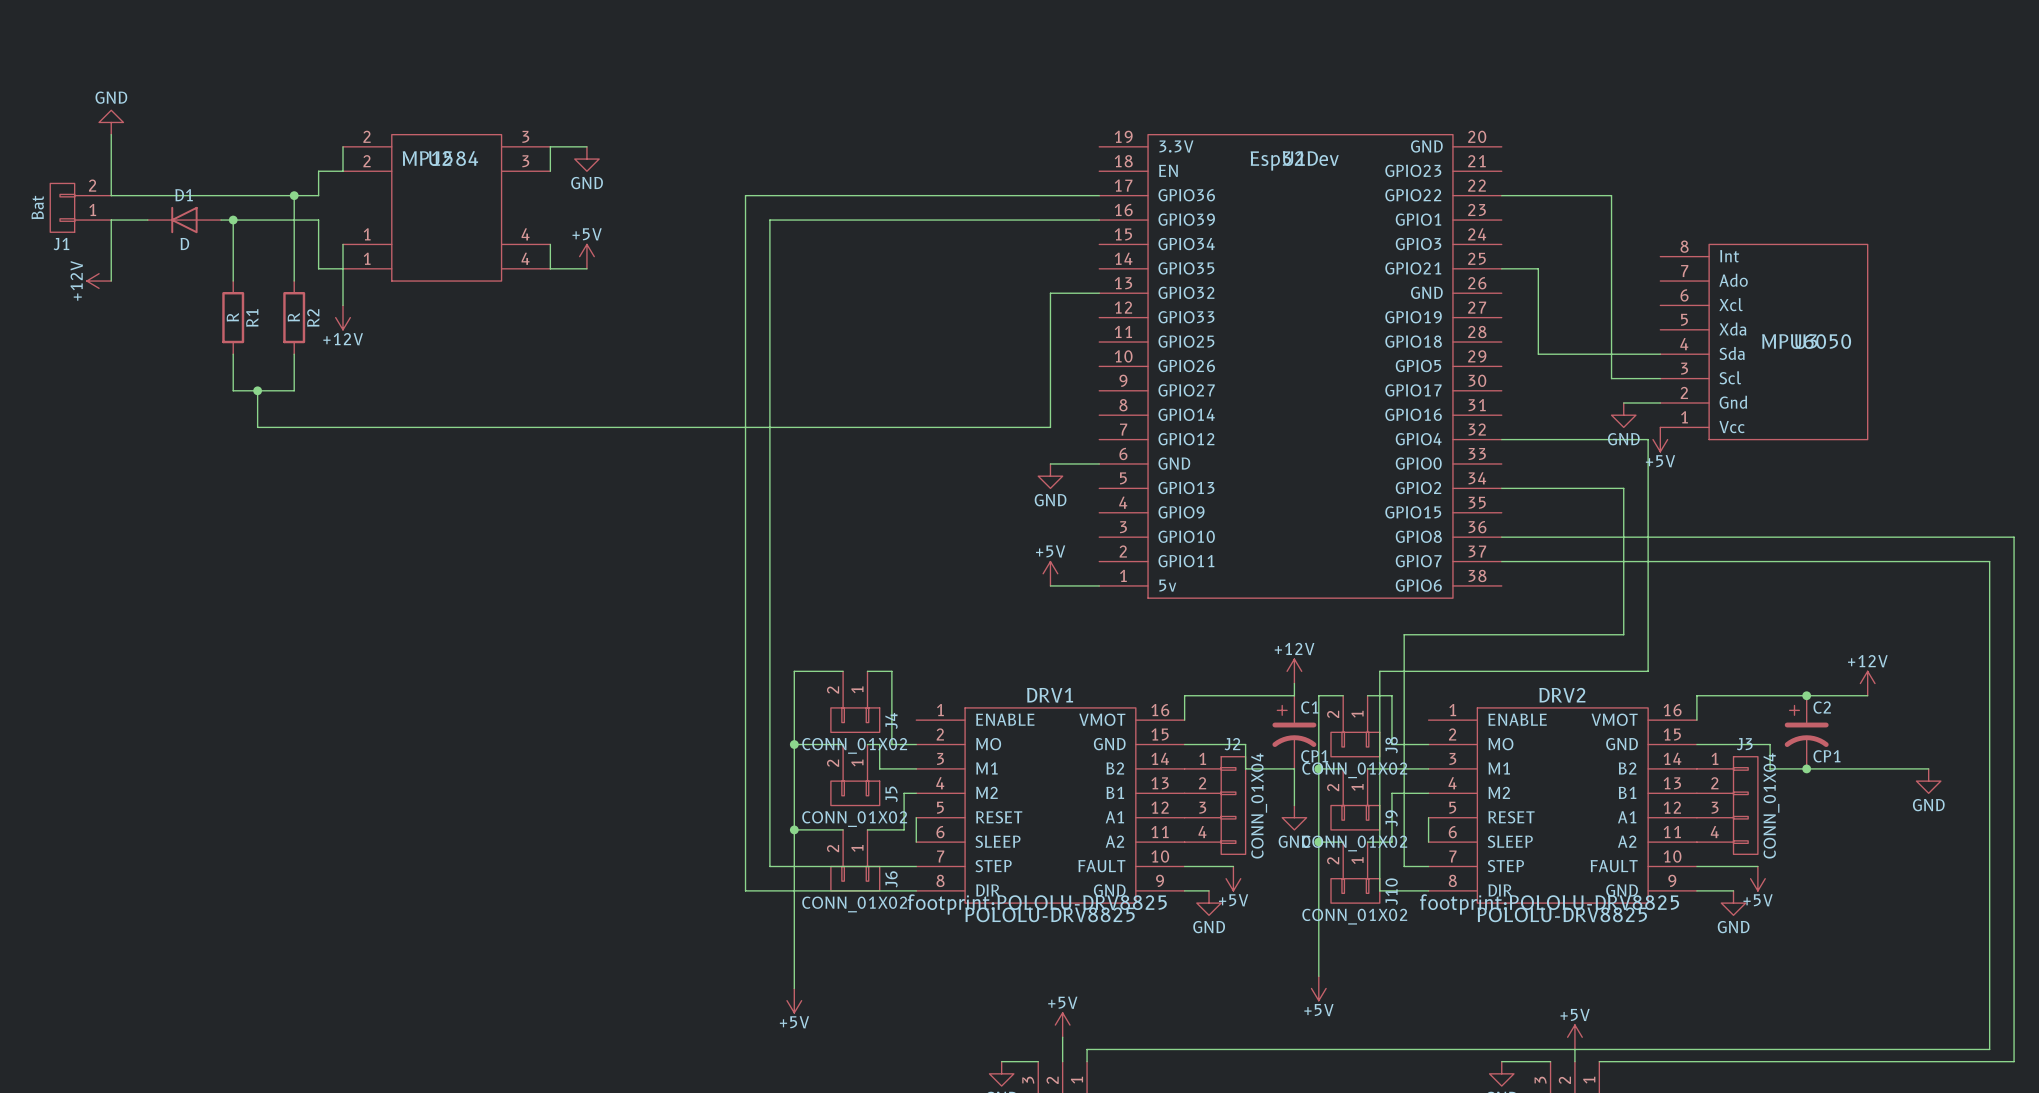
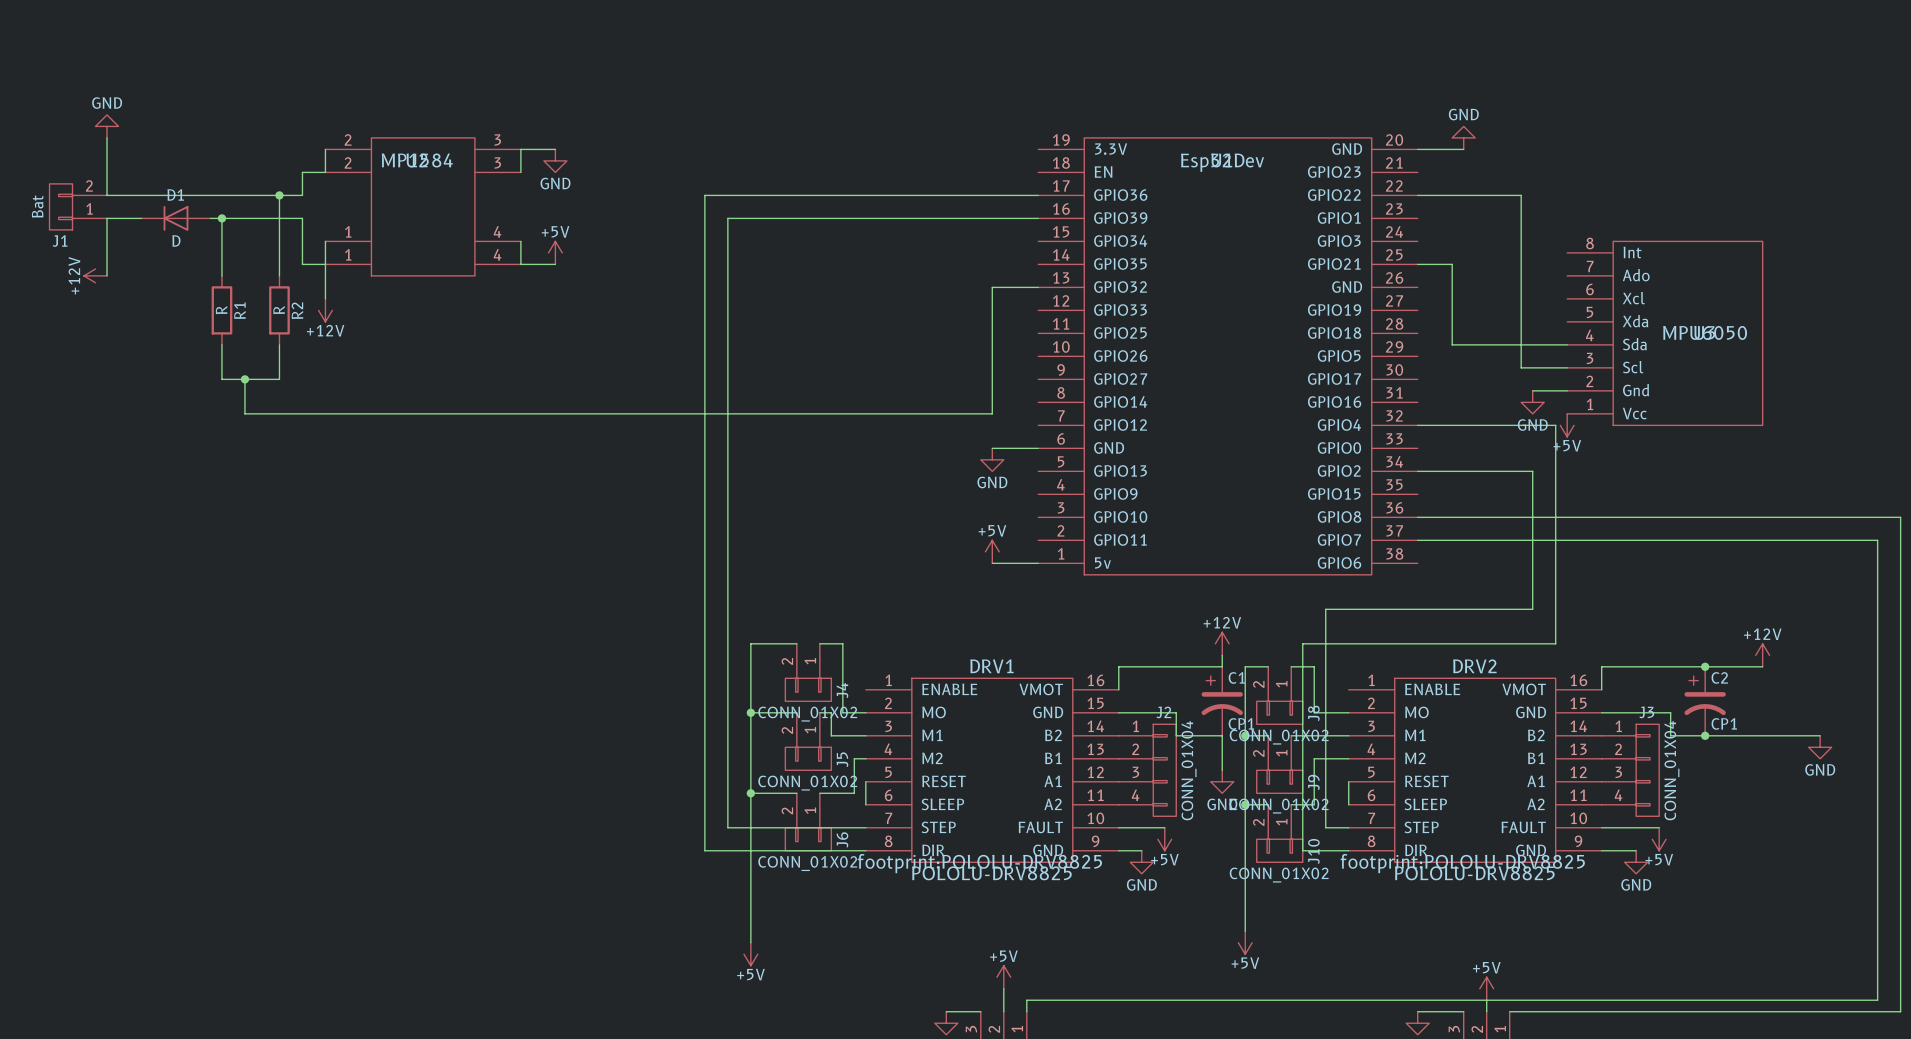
power symbol: none -> GND (1463, 137)
wire: none -> (1417, 149) (1463, 149)

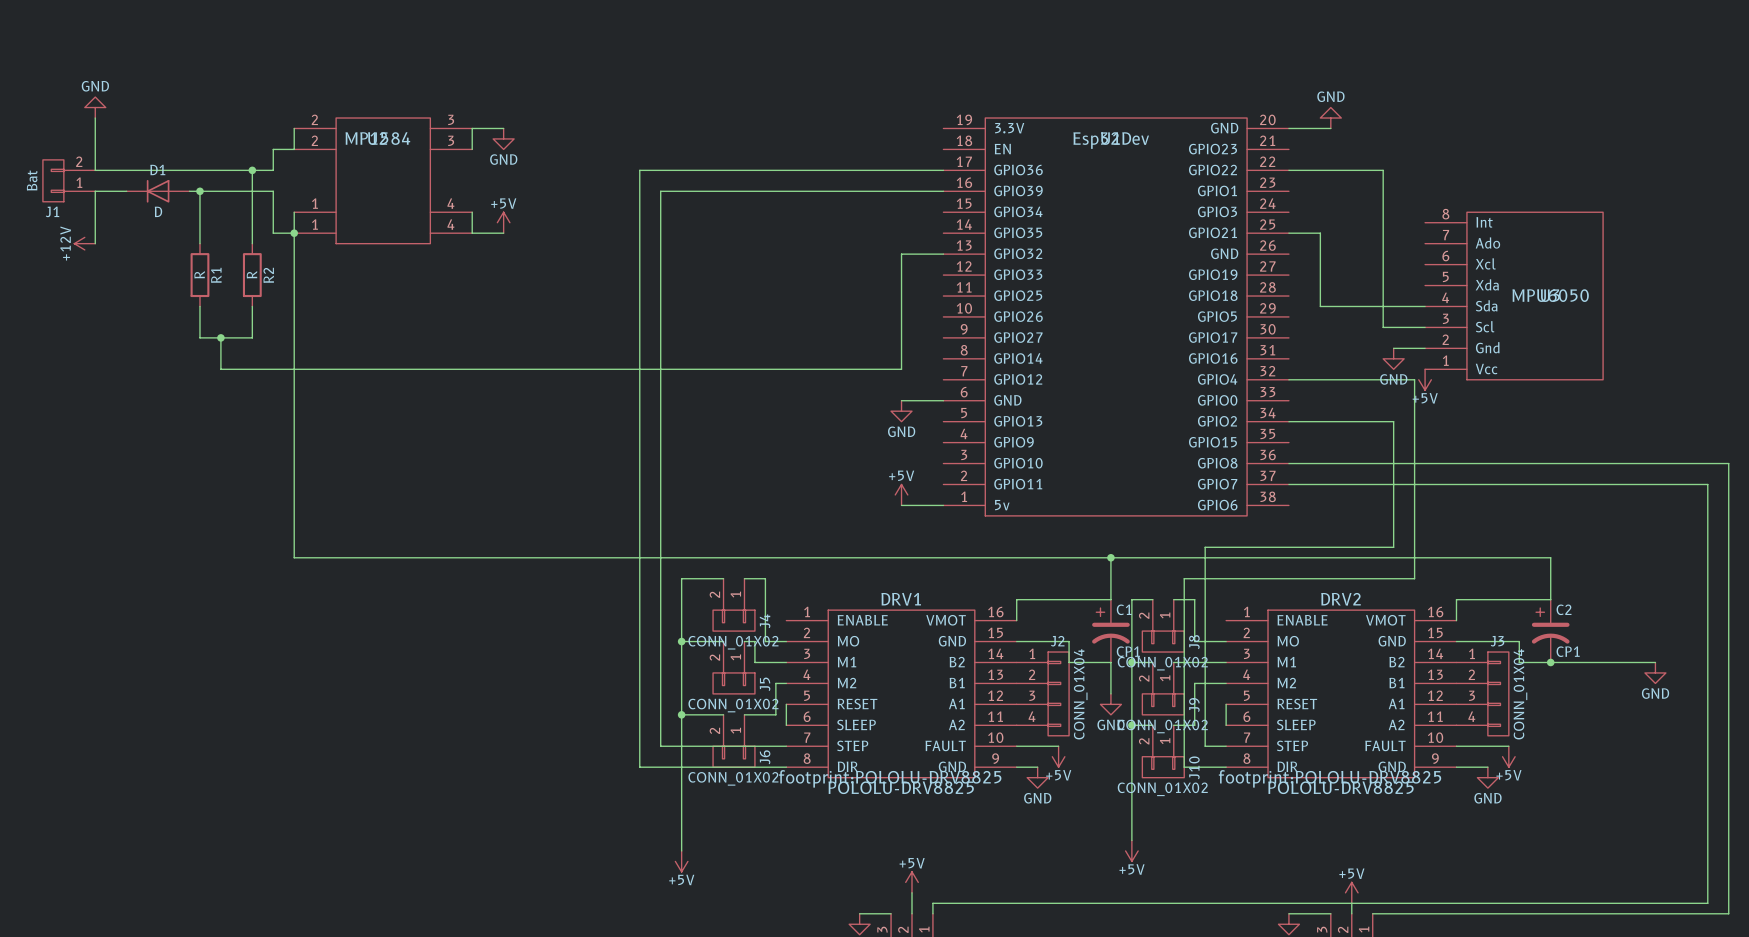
junction: none -> (294, 233)
power symbol: +12V (325, 310) -> none
junction: none -> (1110, 557)
power symbol: +12V (1222, 643) -> none
power symbol: +12V (1762, 655) -> none
wire: (1705, 666) (1762, 666) -> (1550, 599) (1550, 557) (294, 557) (294, 264)
junction: (1705, 666) -> none

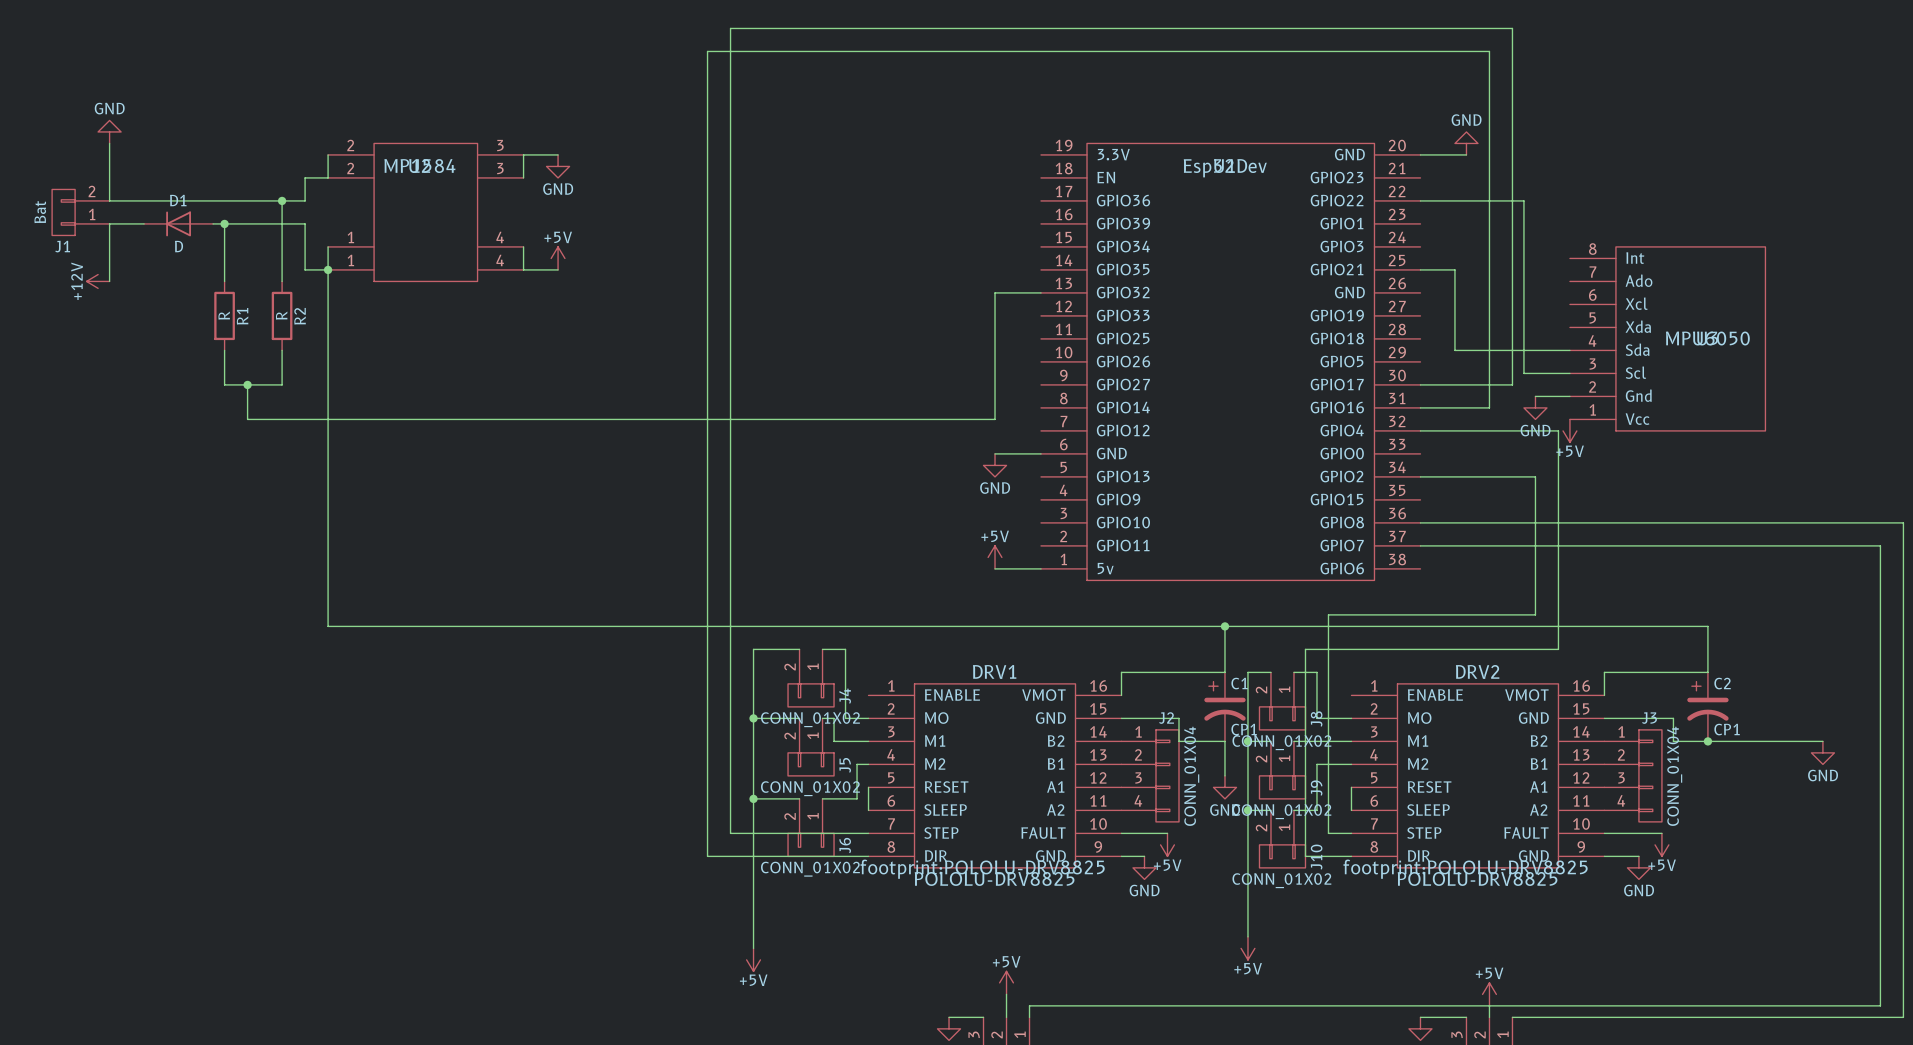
wire: (639, 170) (943, 170) -> (707, 200) (707, 51) (1489, 51) (1489, 407) (1420, 407)
wire: (660, 191) (943, 191) -> (730, 223) (730, 28) (1512, 28) (1512, 384) (1420, 384)

